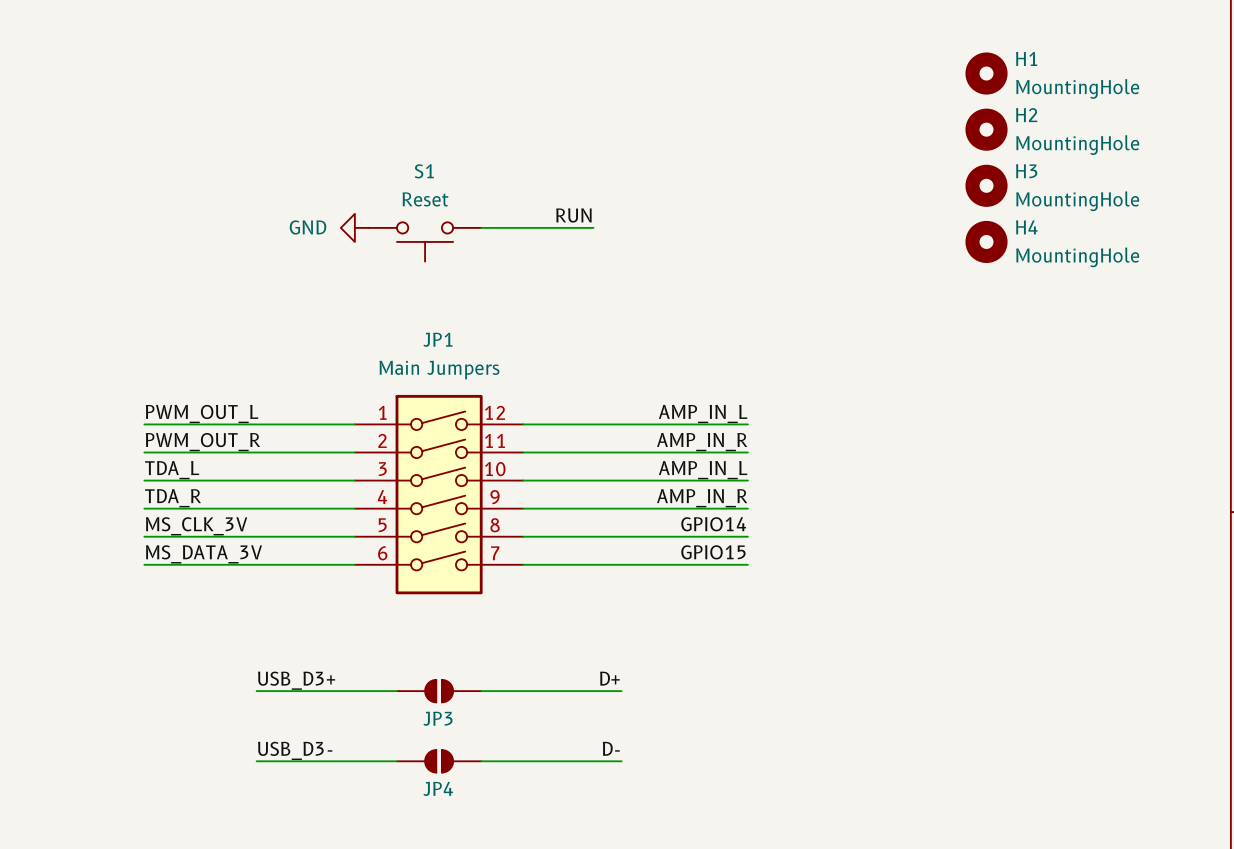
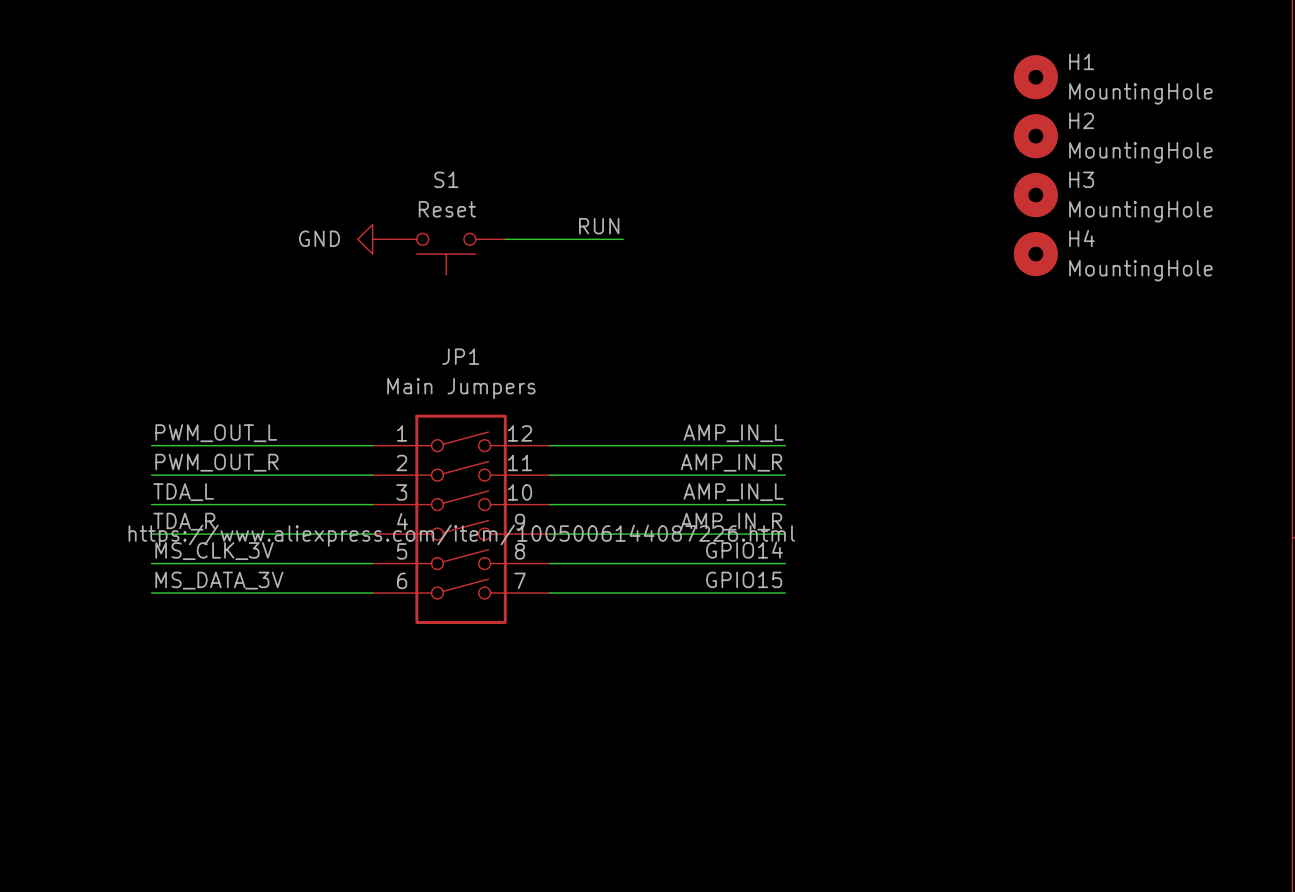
JP1 text: none -> https://www.aliexpress.com/item/1005006144087226.html (461, 535)
label: D+ (609, 678) -> none
label: USB_D3+ (296, 680) -> none
wire: (256, 691) (396, 691) -> none
JP3: (439, 691) -> none
wire: (481, 691) (621, 691) -> none
label: D- (611, 748) -> none
label: USB_D3- (295, 750) -> none
wire: (256, 761) (396, 761) -> none
JP4: (439, 761) -> none
wire: (481, 761) (621, 761) -> none

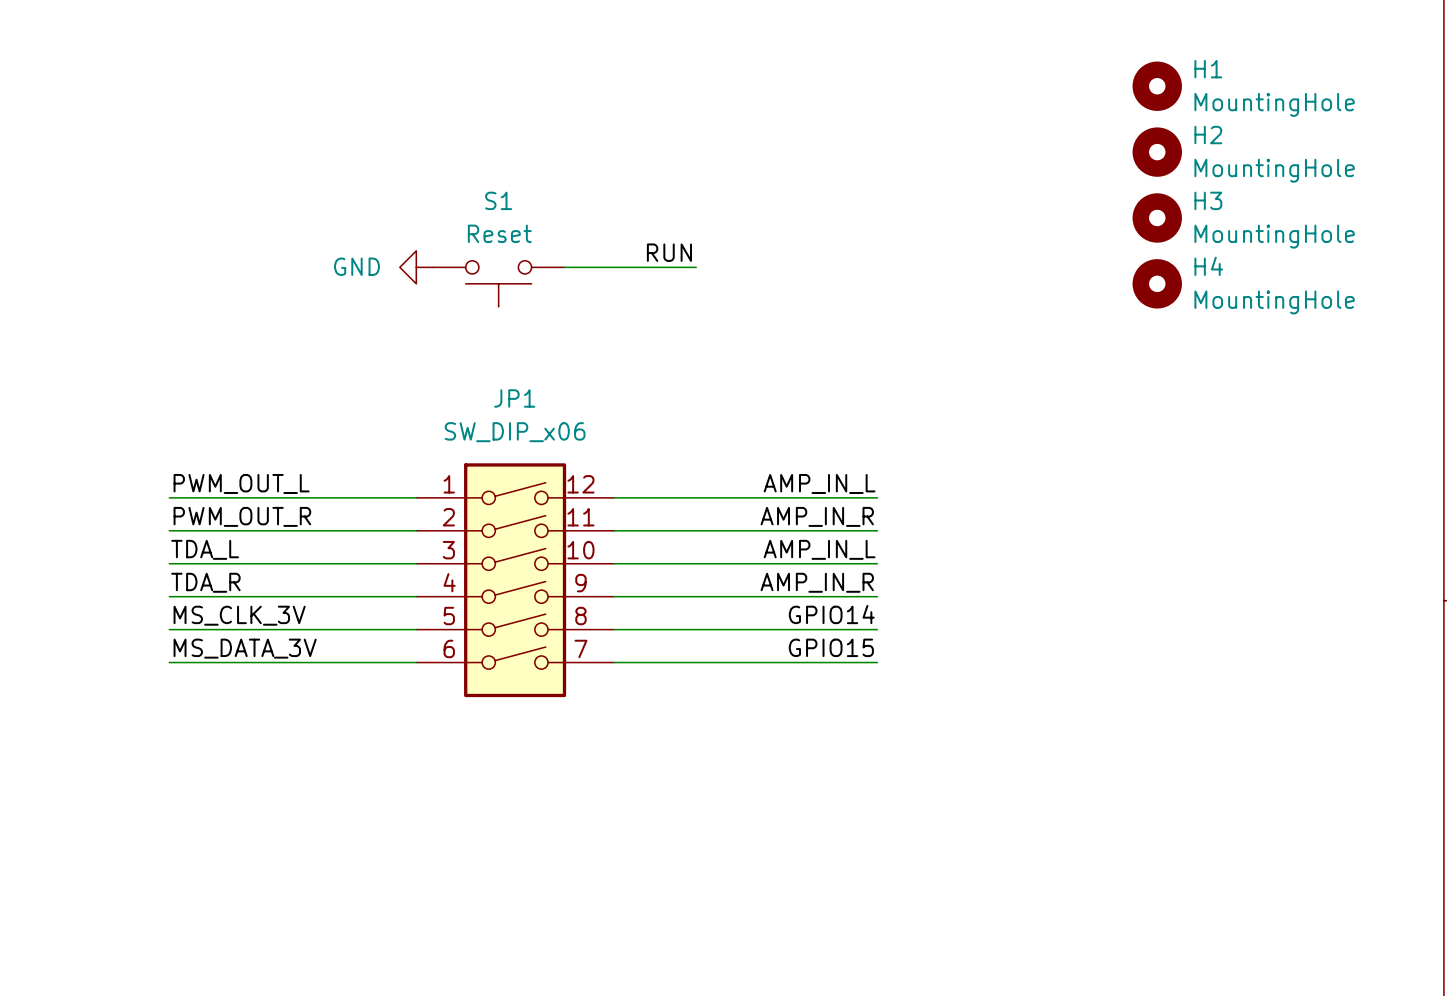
JP1 value: Main Jumpers (461, 388) -> SW_DIP_x06 (515, 432)
JP1 text: https://www.aliexpress.com/item/1005006144087226.html (461, 535) -> none

